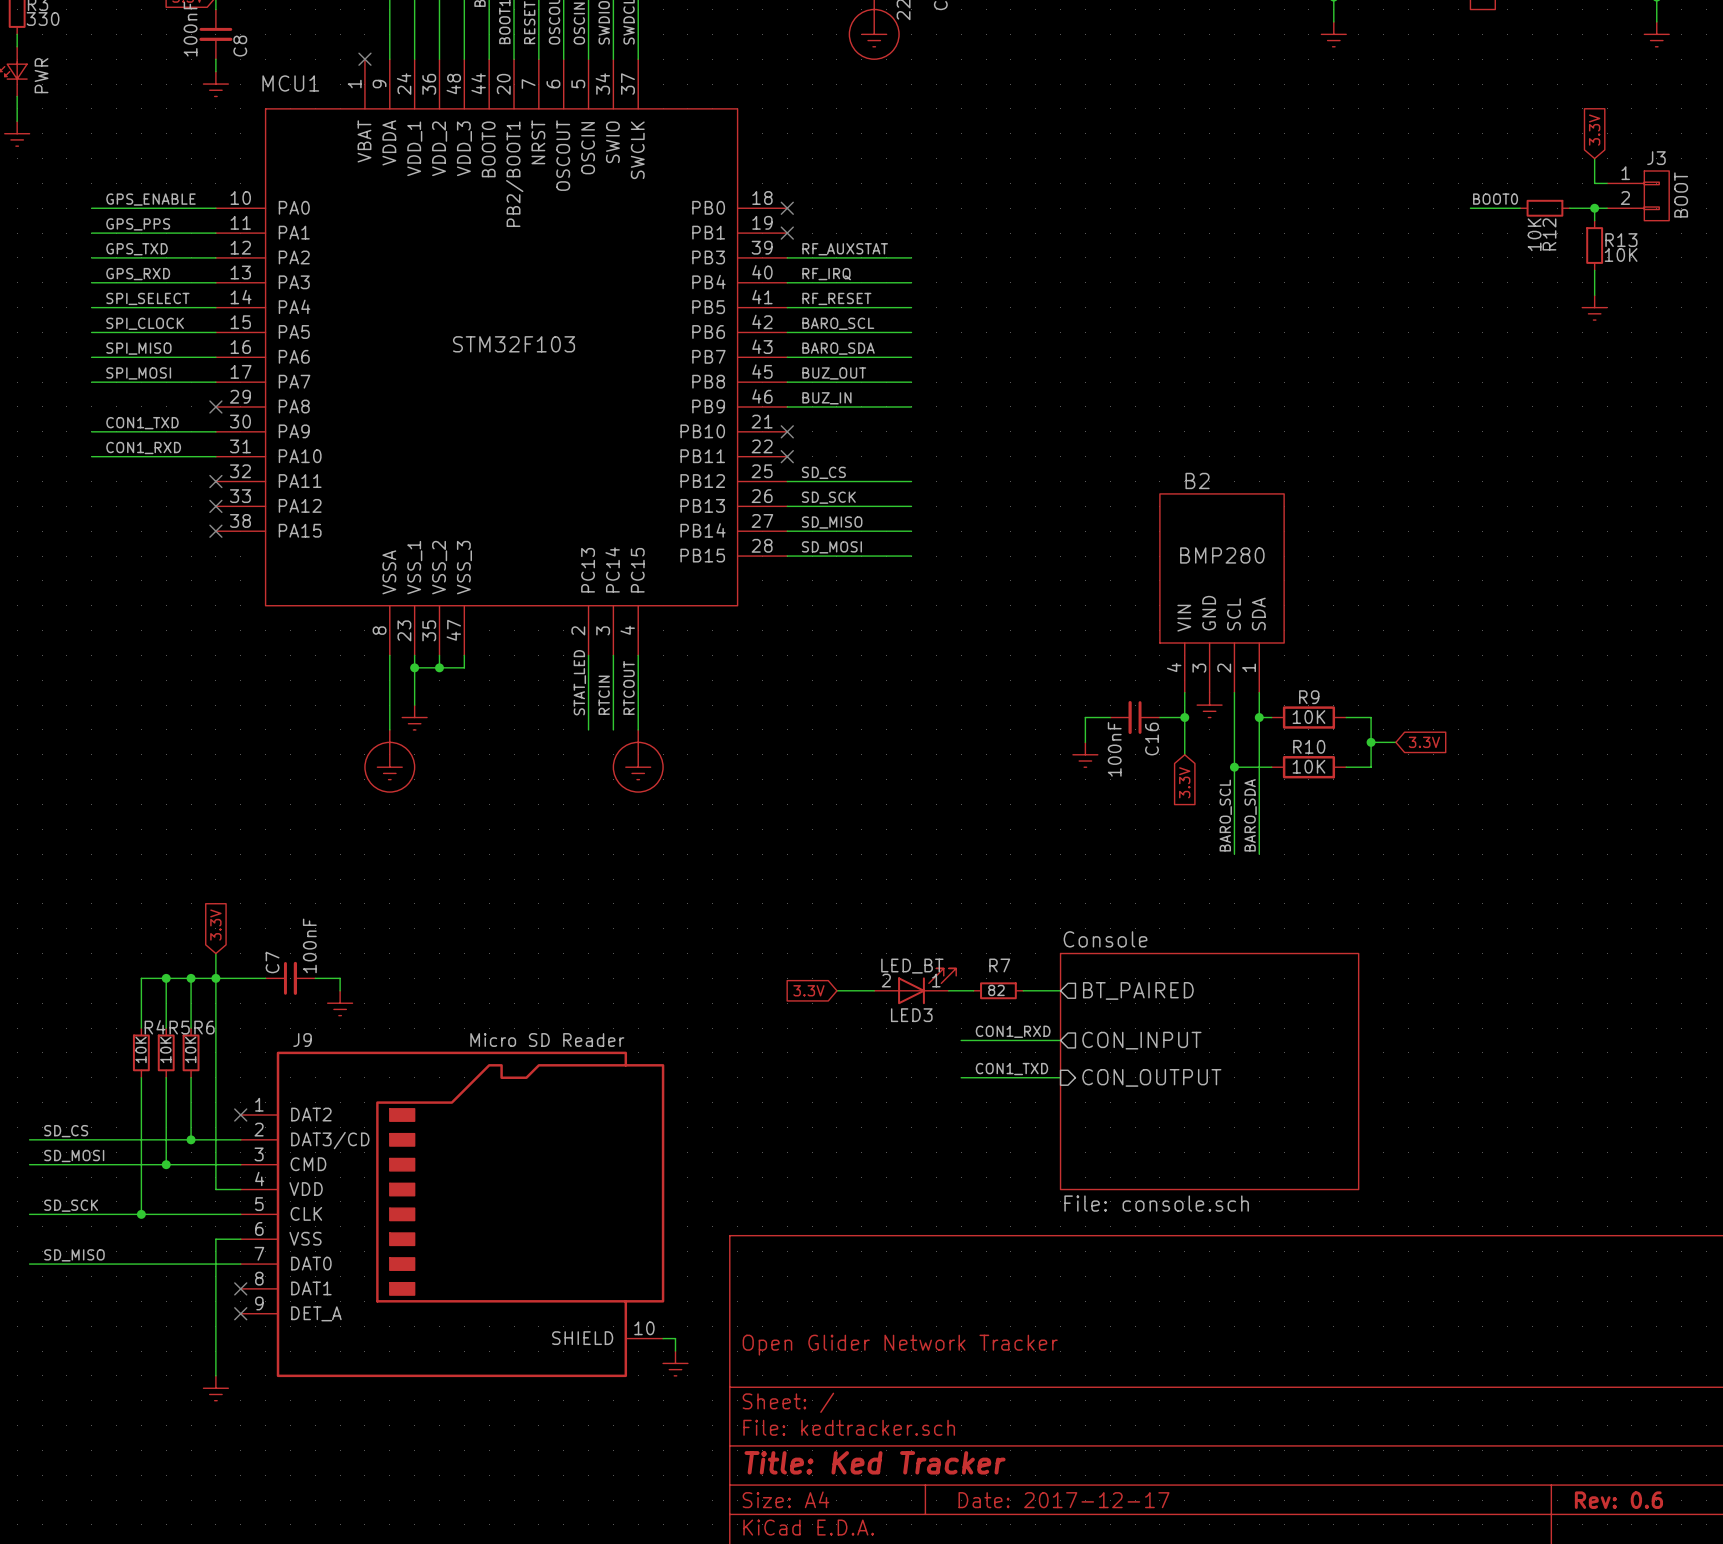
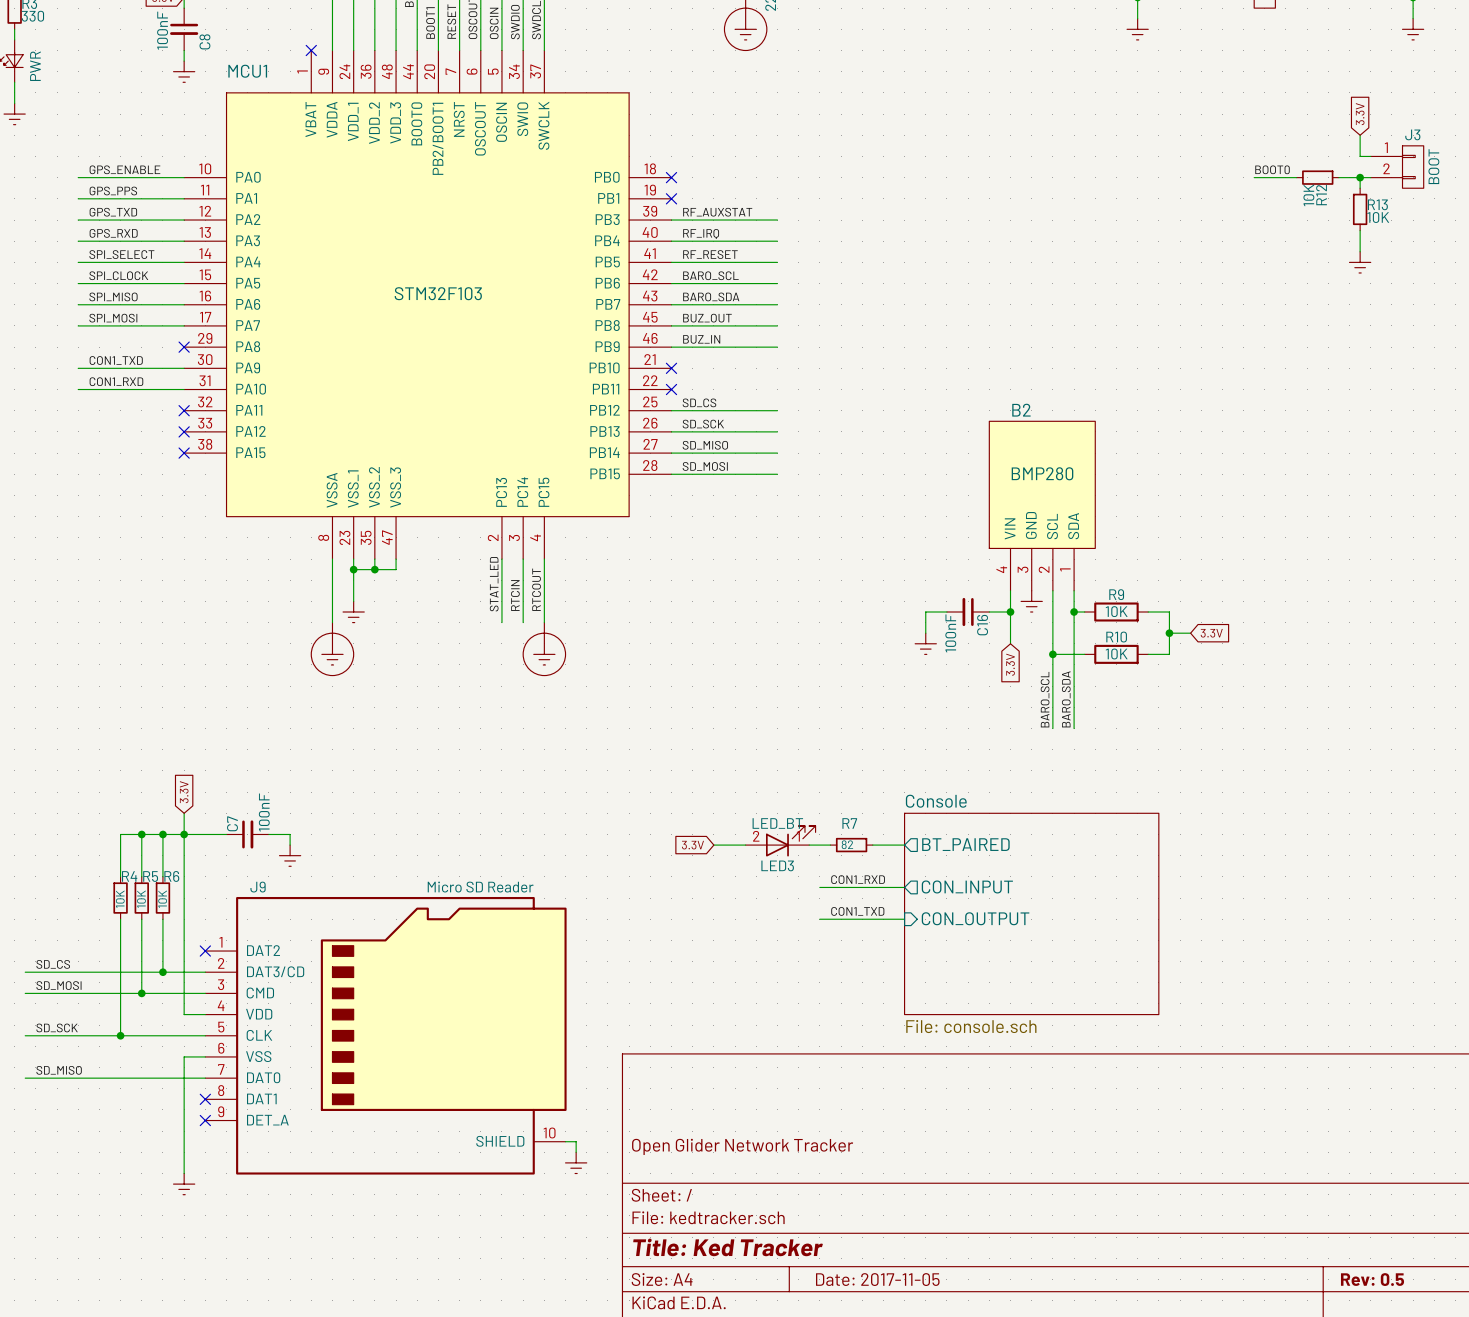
title block: Date: 2017-12-17 (1064, 1500) -> Date: 2017-11-05 (877, 1279)
title block: Rev: 0.6 (1618, 1500) -> Rev: 0.5 (1372, 1279)

